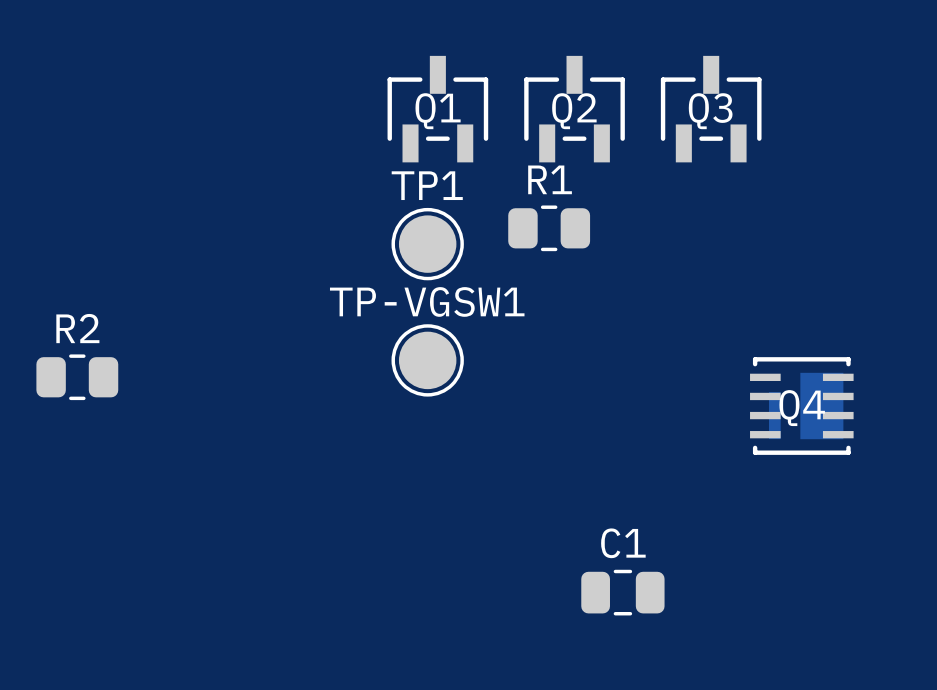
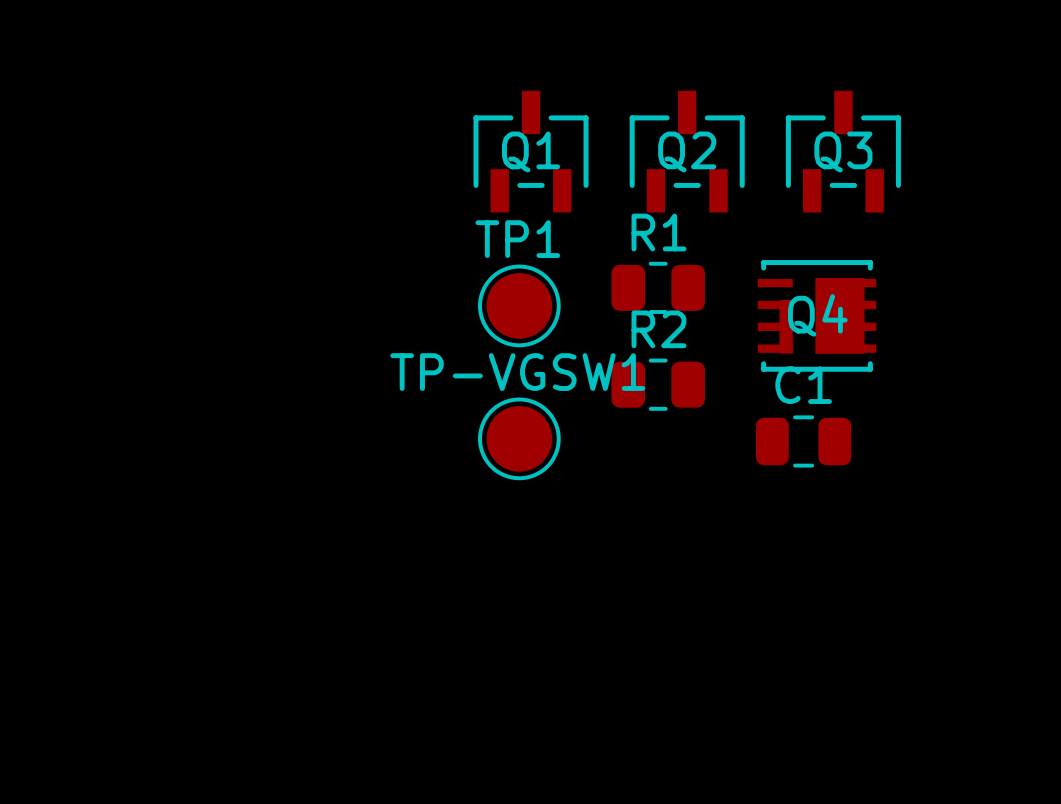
R2 position: (77, 377) -> (658, 384)
Q4 position: (801, 406) -> (817, 315)
C1 position: (622, 592) -> (803, 441)

